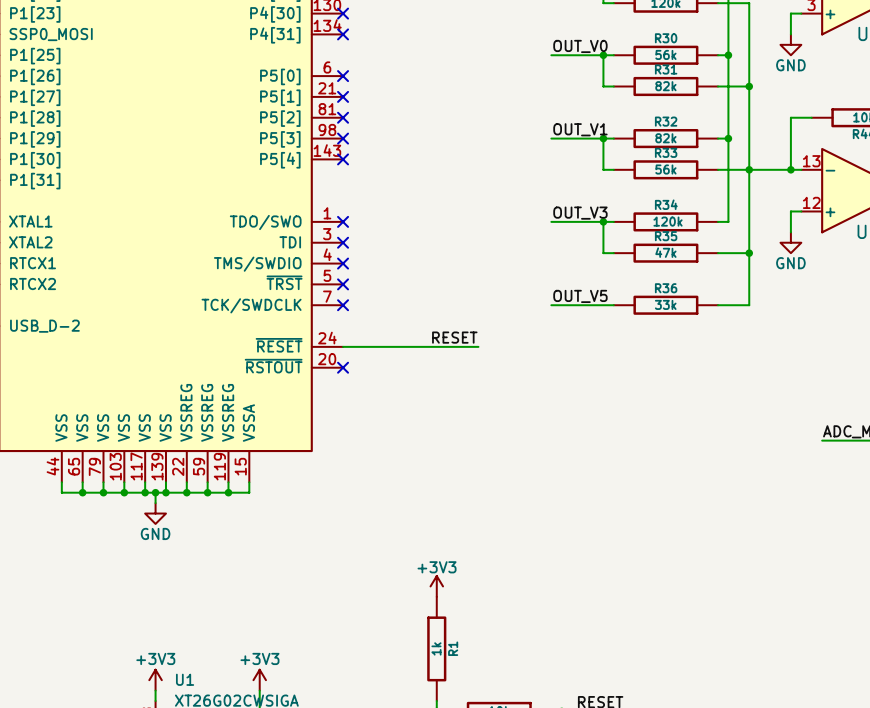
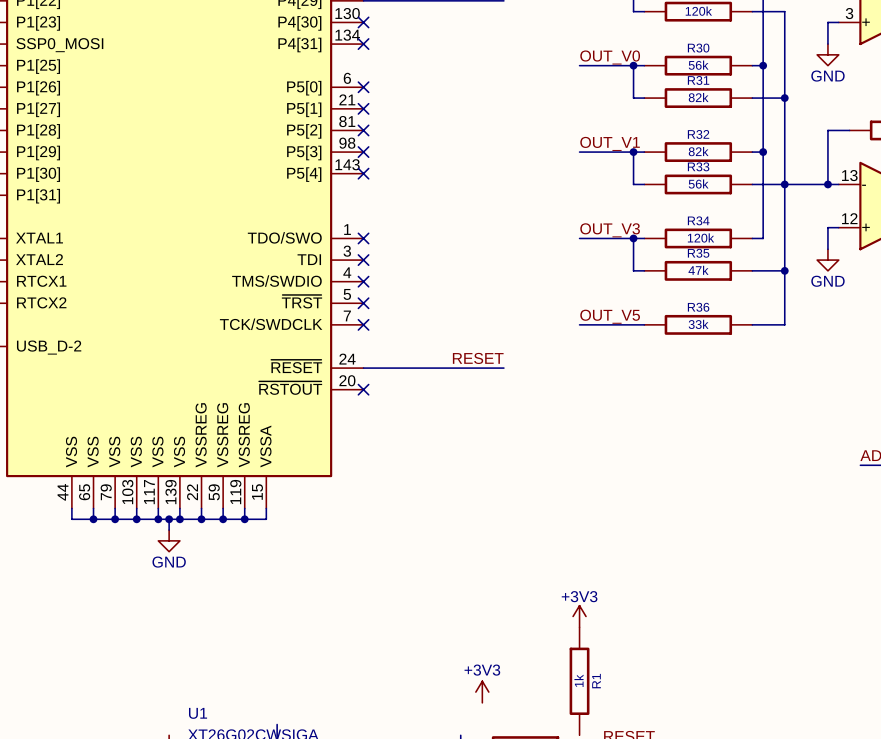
power symbol: +3V3 (436, 586) -> none
power symbol: none -> +3V3 (579, 616)
R1 position: (436, 648) -> (579, 681)
power symbol: none -> +3V3 (482, 692)
power symbol: +3V3 (155, 680) -> none
power symbol: +3V3 (259, 680) -> none
wire: (155, 690) (155, 701) -> none

